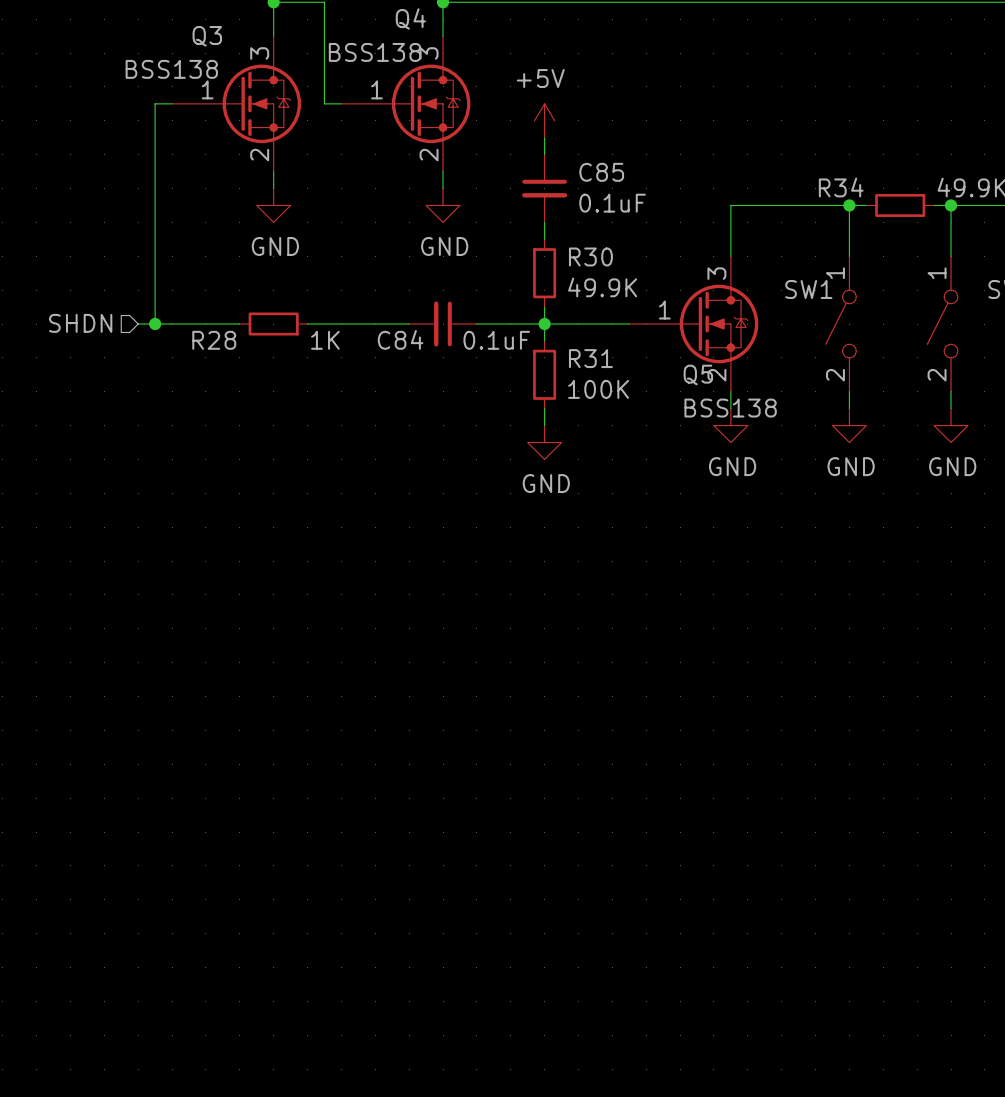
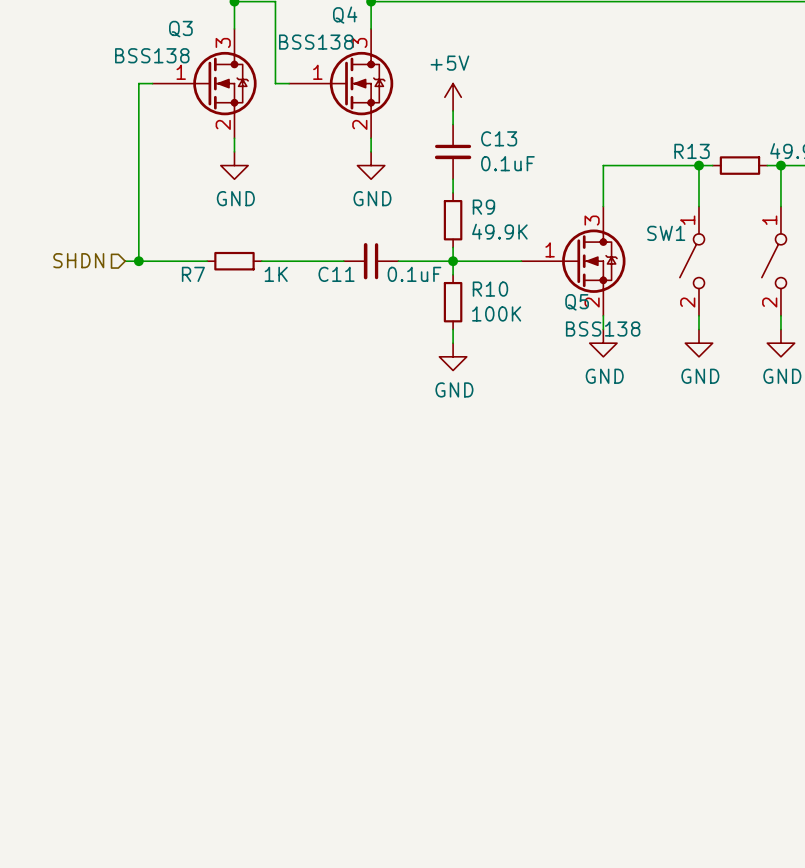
C85 name: C85 (601, 172) -> C13 (499, 138)
R34 name: R34 (841, 187) -> R13 (692, 151)
R30 name: R30 (590, 256) -> R9 (483, 207)
C84 name: C84 (400, 339) -> C11 (336, 274)
R28 name: R28 (214, 340) -> R7 (193, 274)
R31 name: R31 (590, 358) -> R10 (490, 289)

